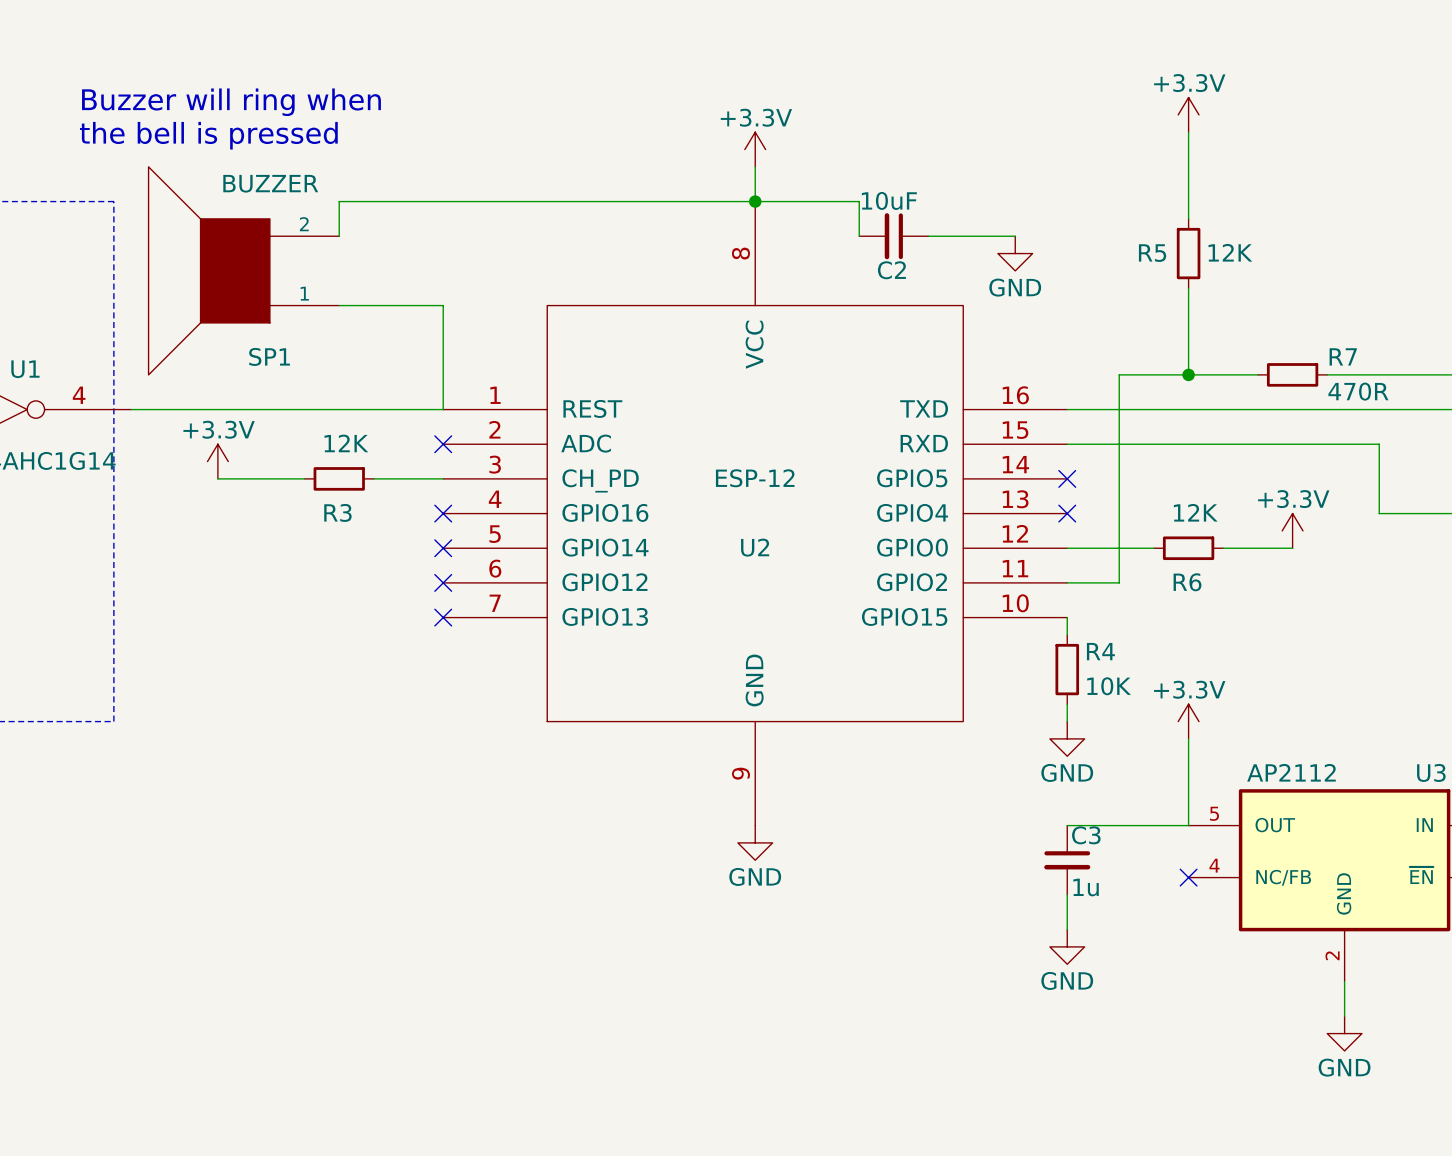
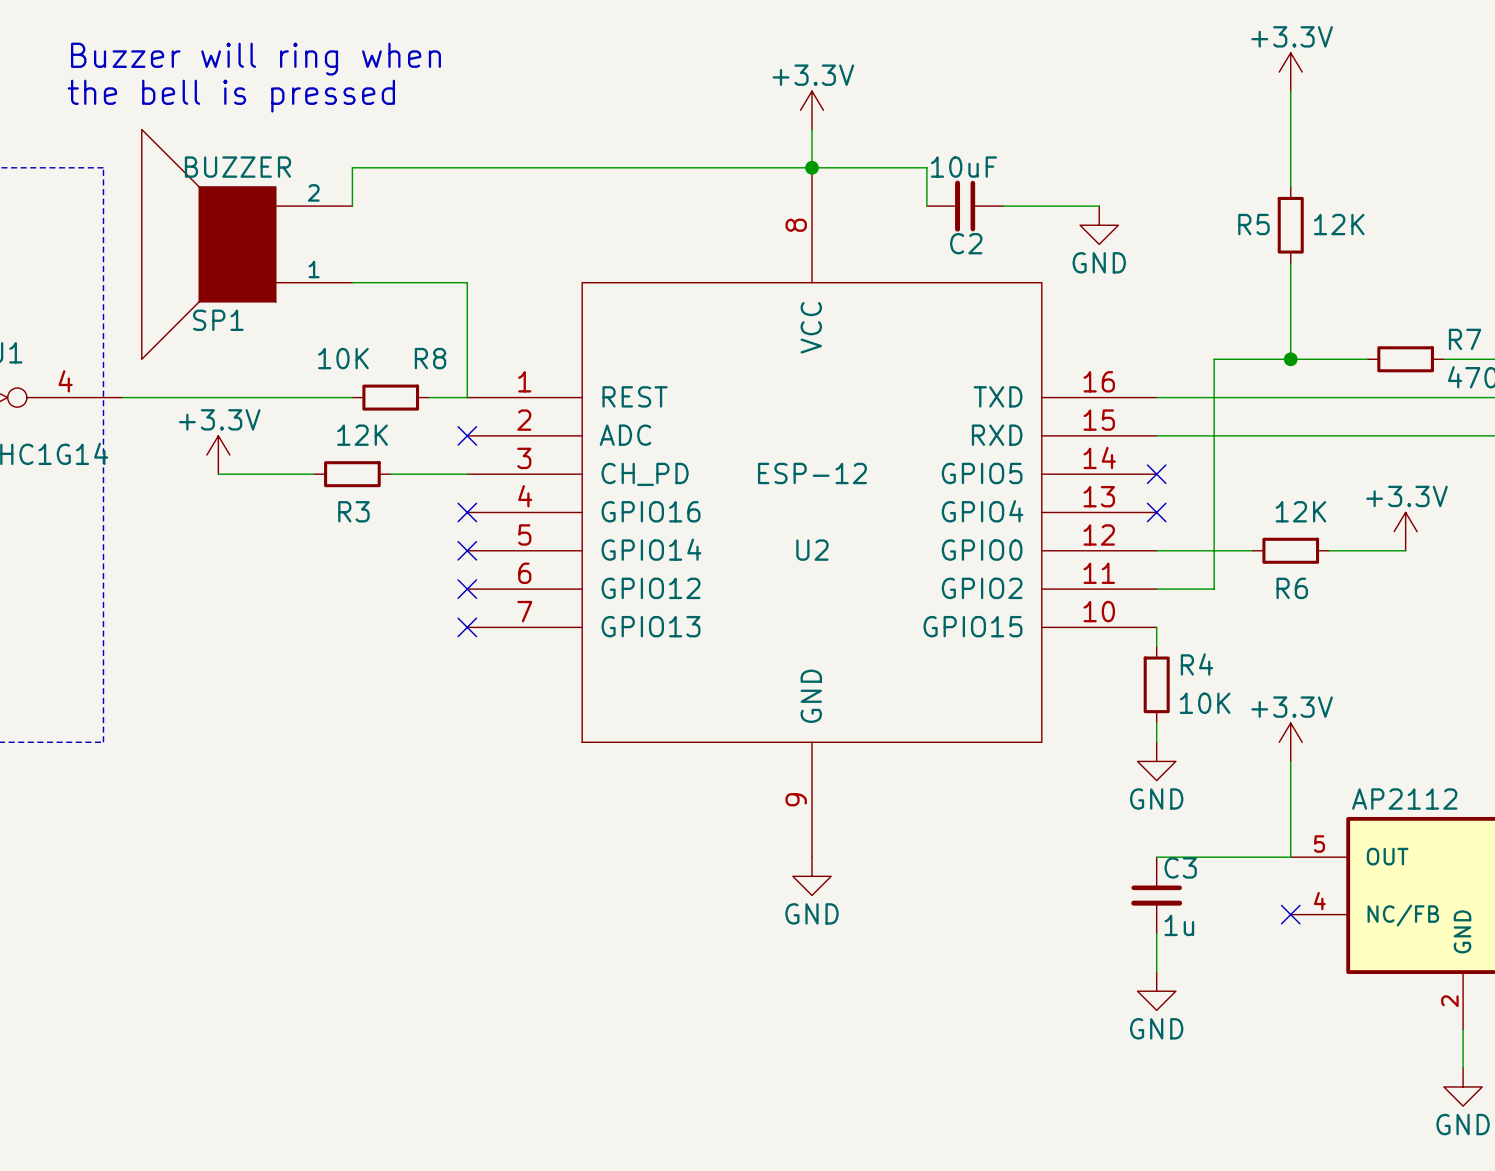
SP1 value position: BUZZER (270, 183) -> BUZZER (237, 167)
SP1 name position: SP1 (269, 356) -> SP1 (218, 320)
wire: (339, 409) (408, 409) -> none
R8: none -> 10K (390, 397)

